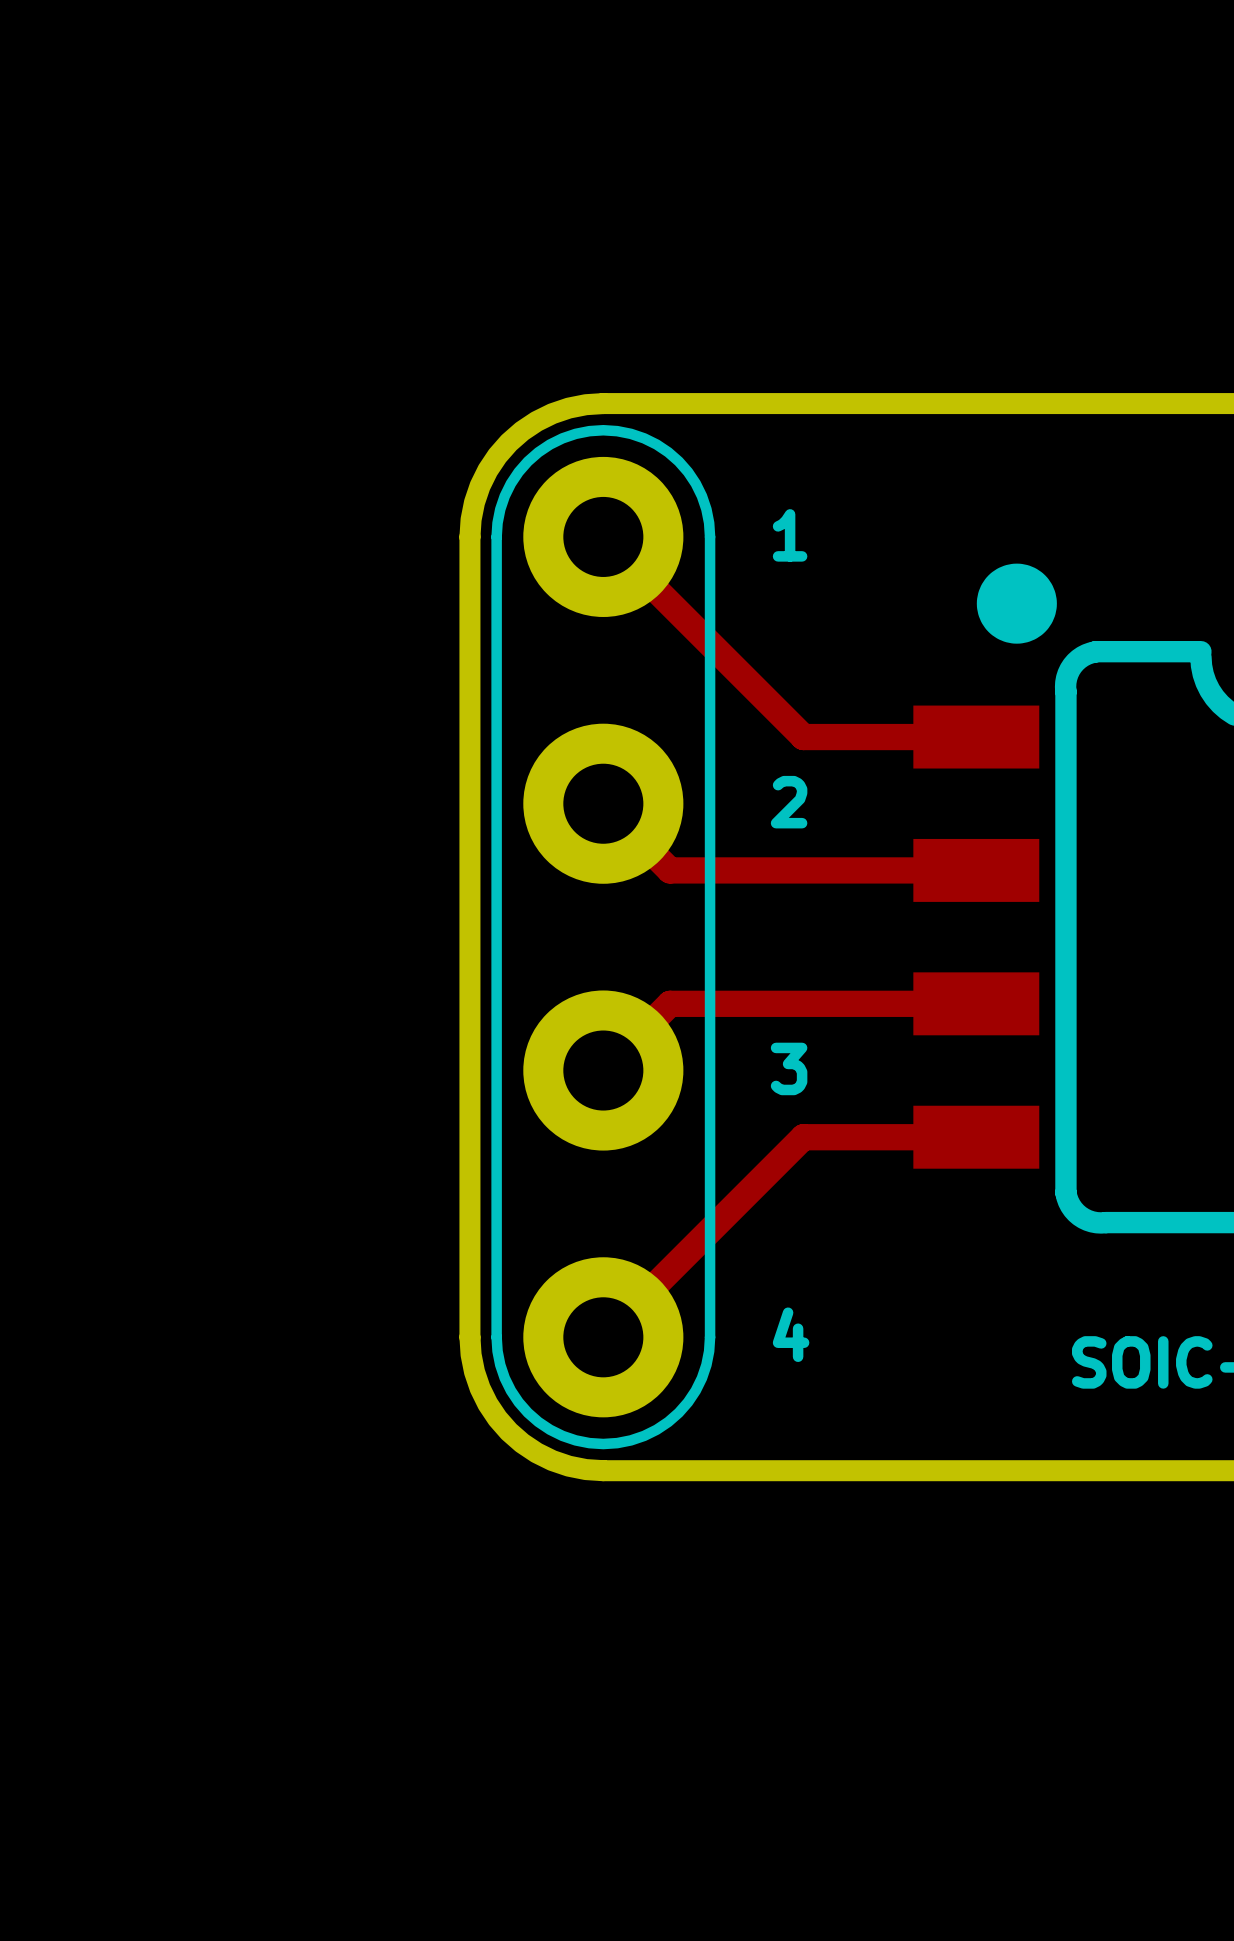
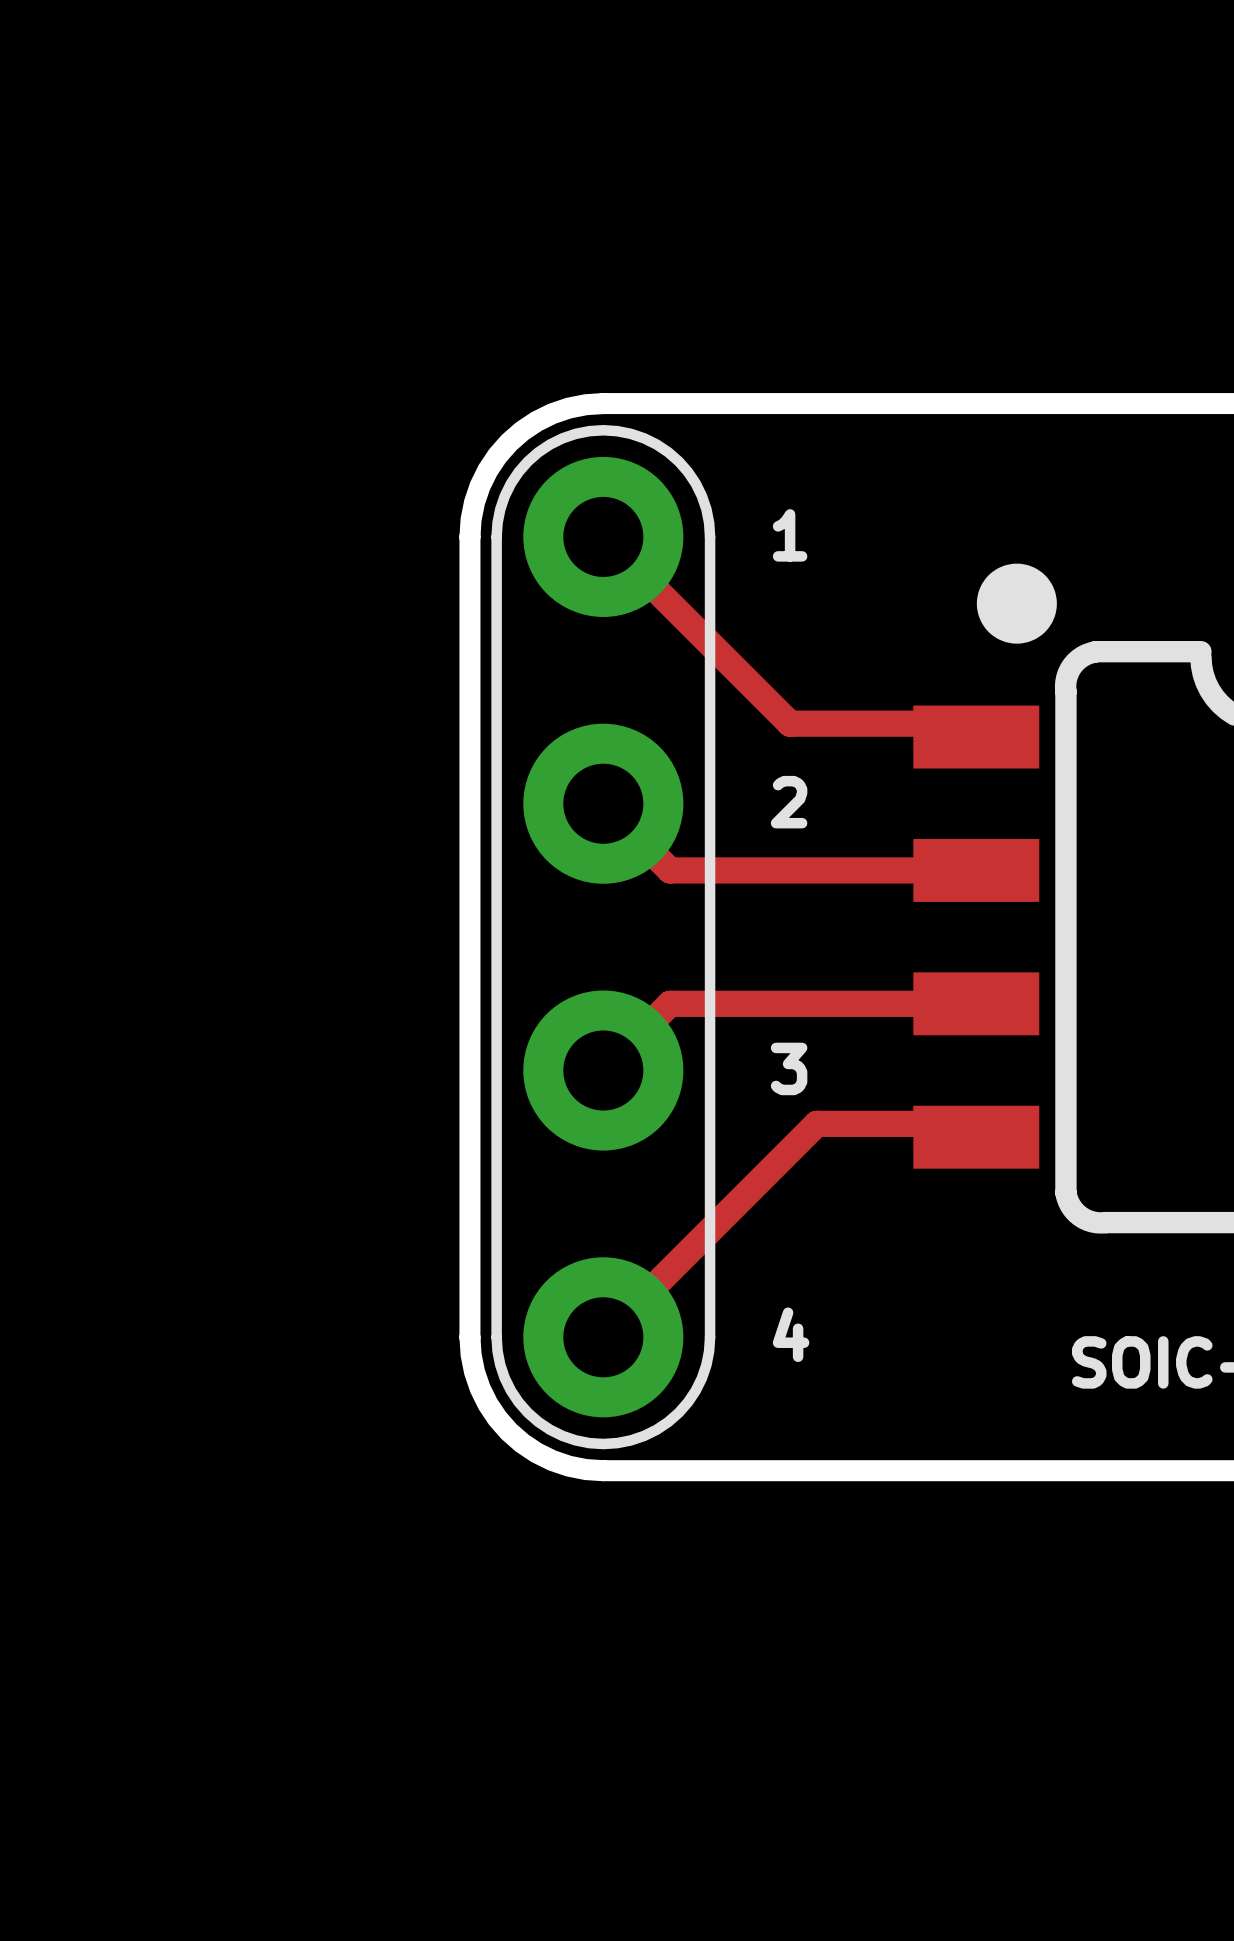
top track: (790, 723) (803, 737) (1002, 737) -> (790, 723) (1003, 723)
top track: (803, 1137) (1002, 1137) -> (803, 1137) (816, 1123) (1003, 1123)

